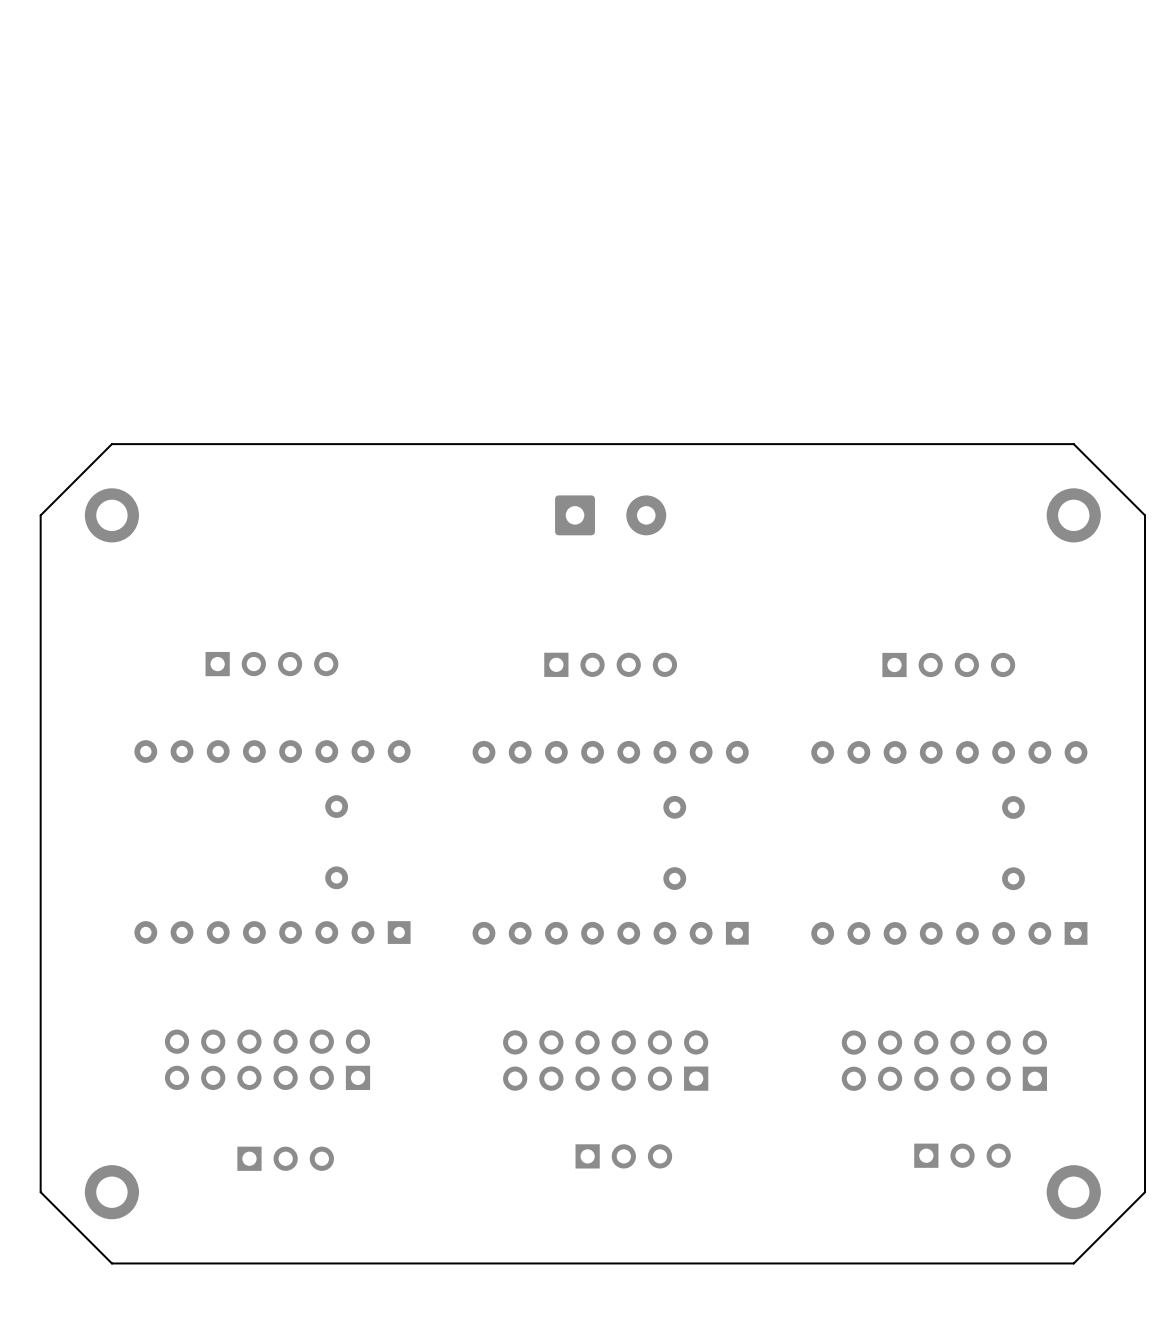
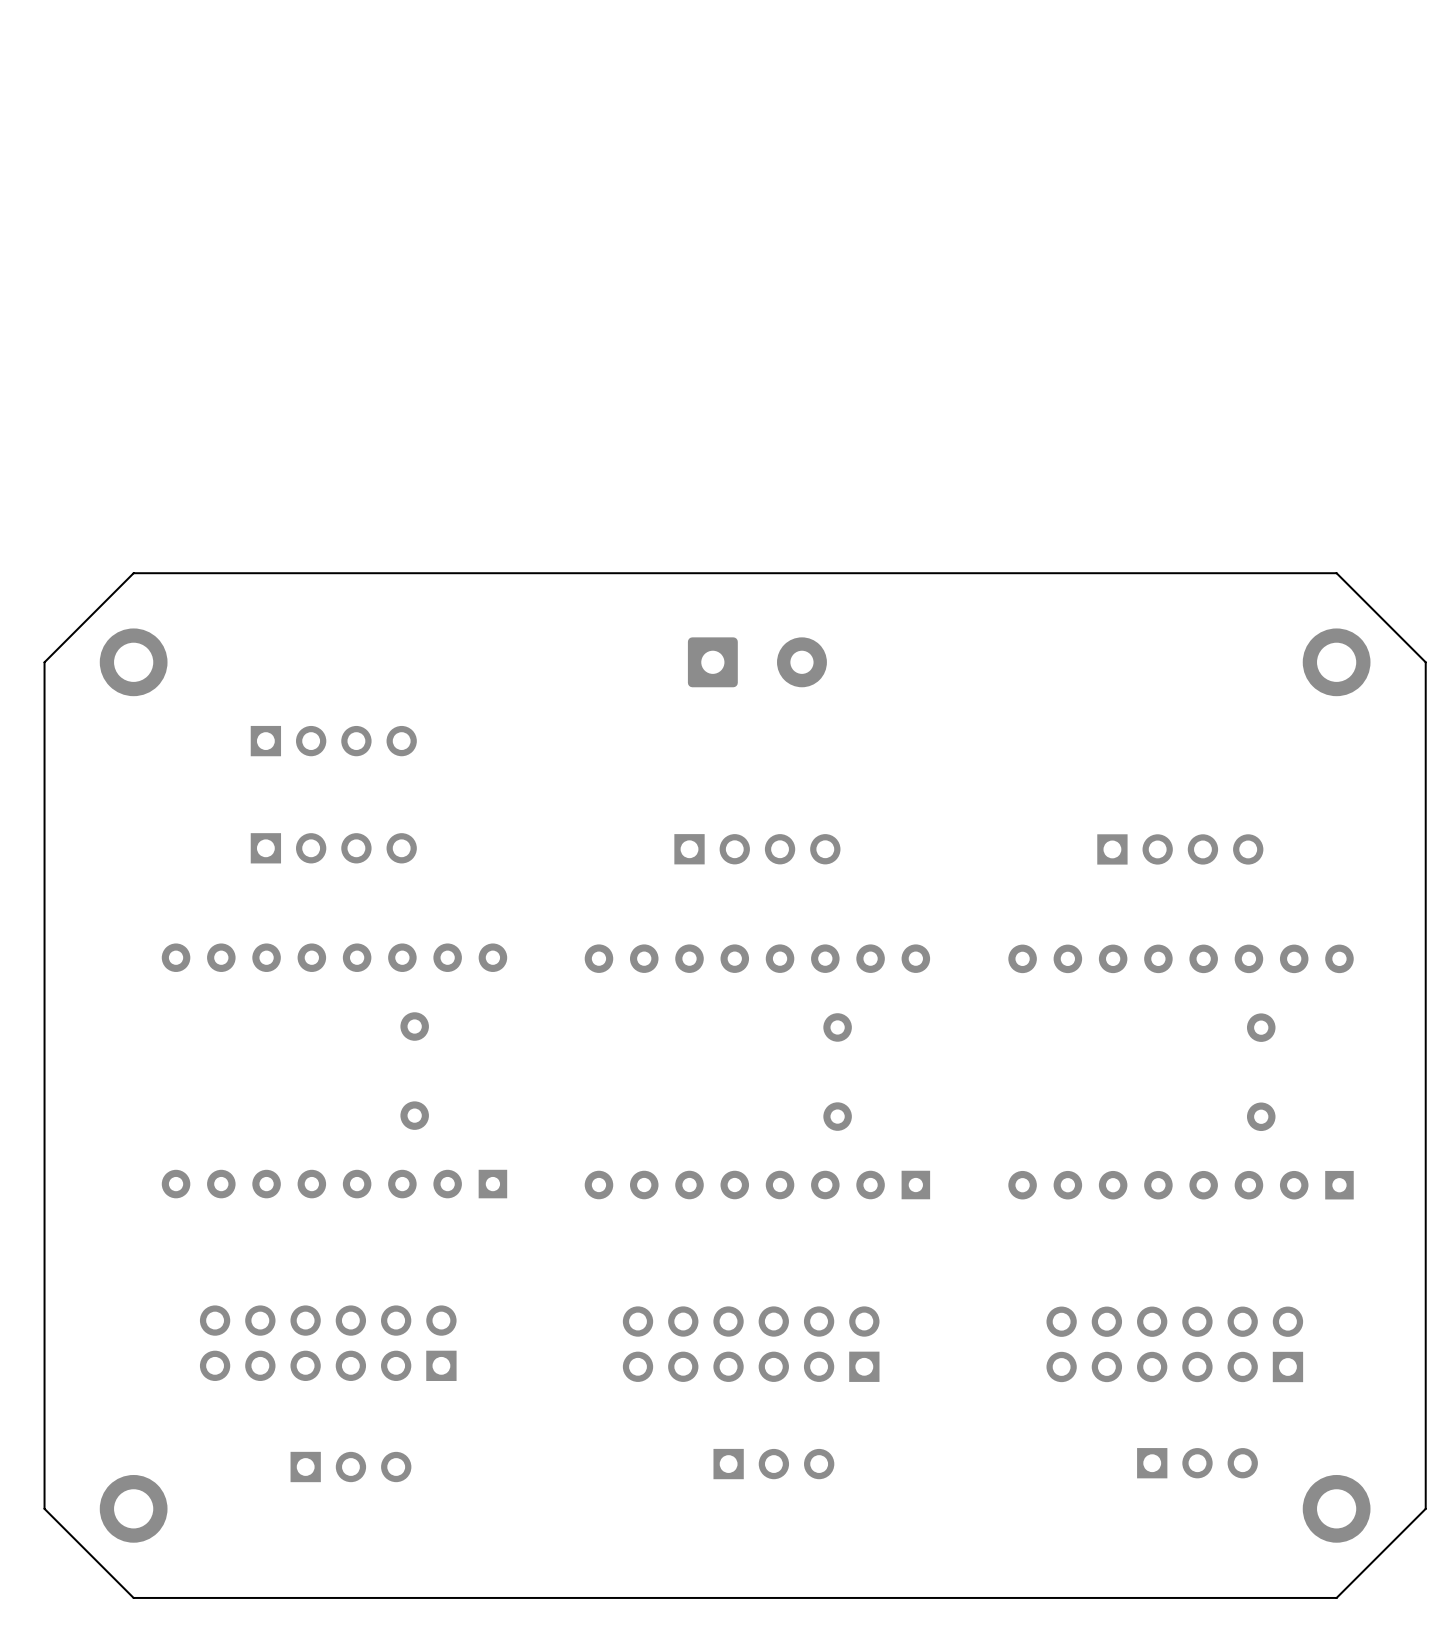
part: none -> (333, 741)

